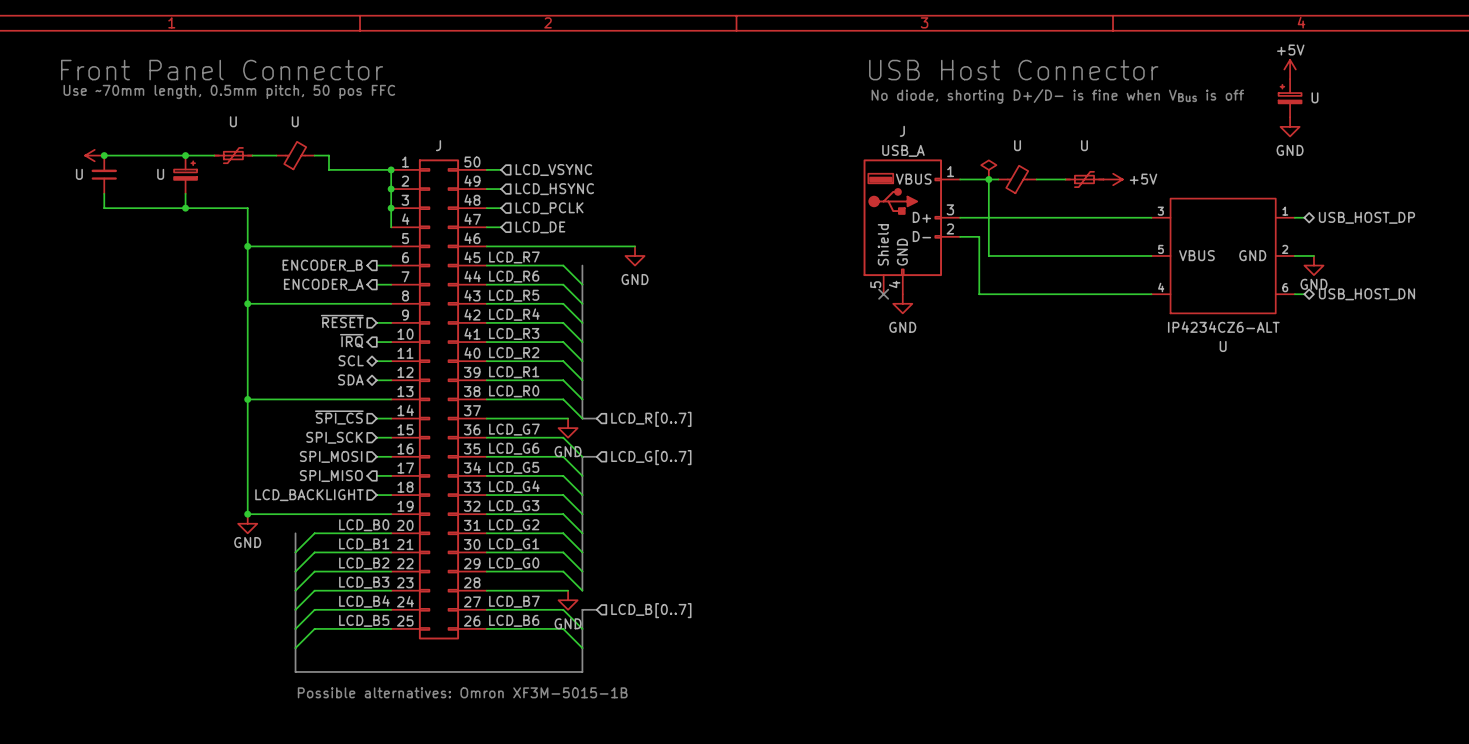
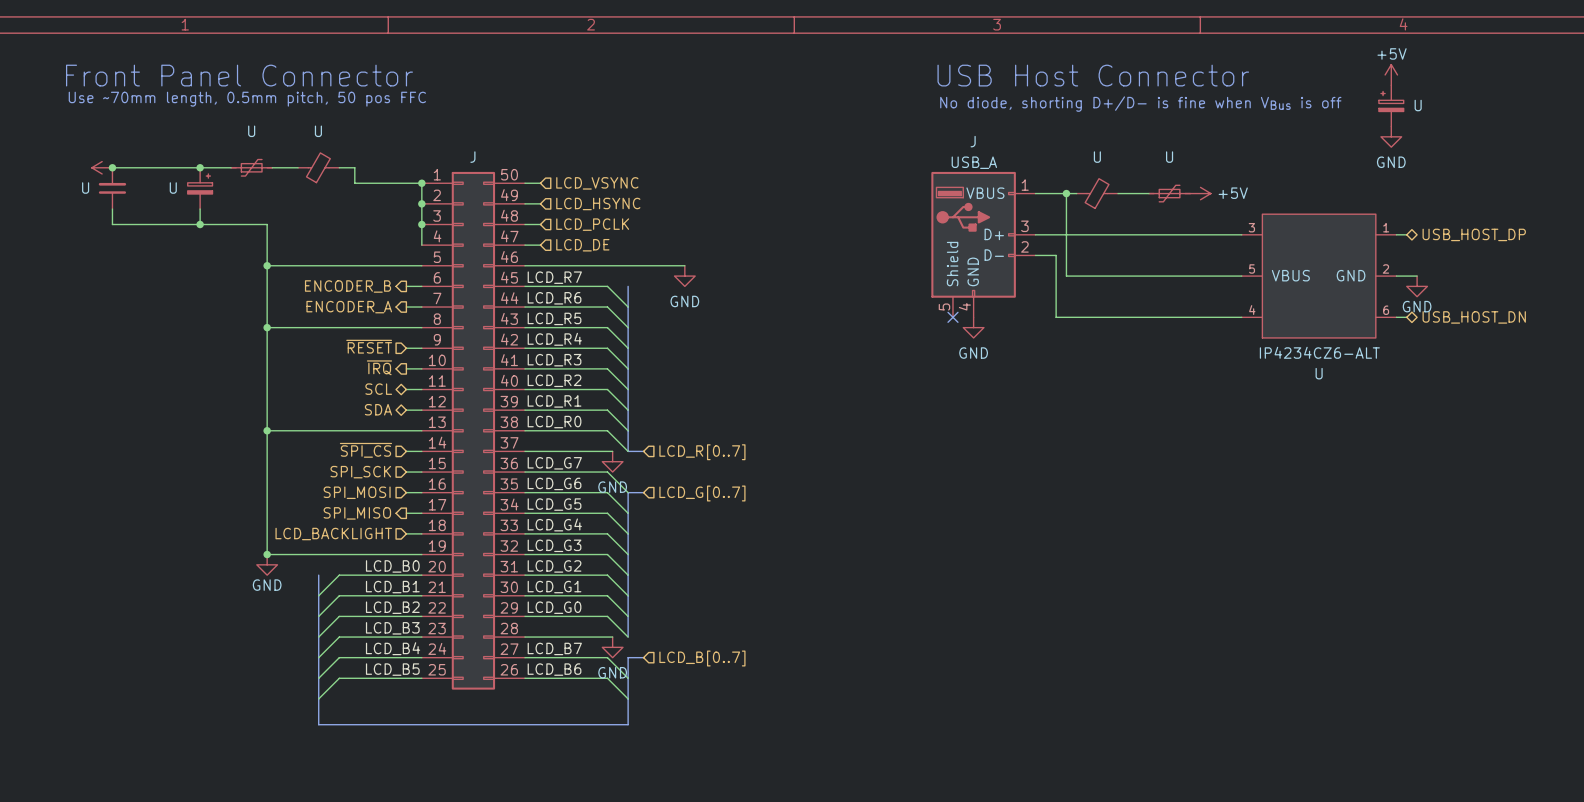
power symbol: (988, 169) -> none
text: Possible alternatives: Omron XF3M-5015-1B (462, 692) -> none

